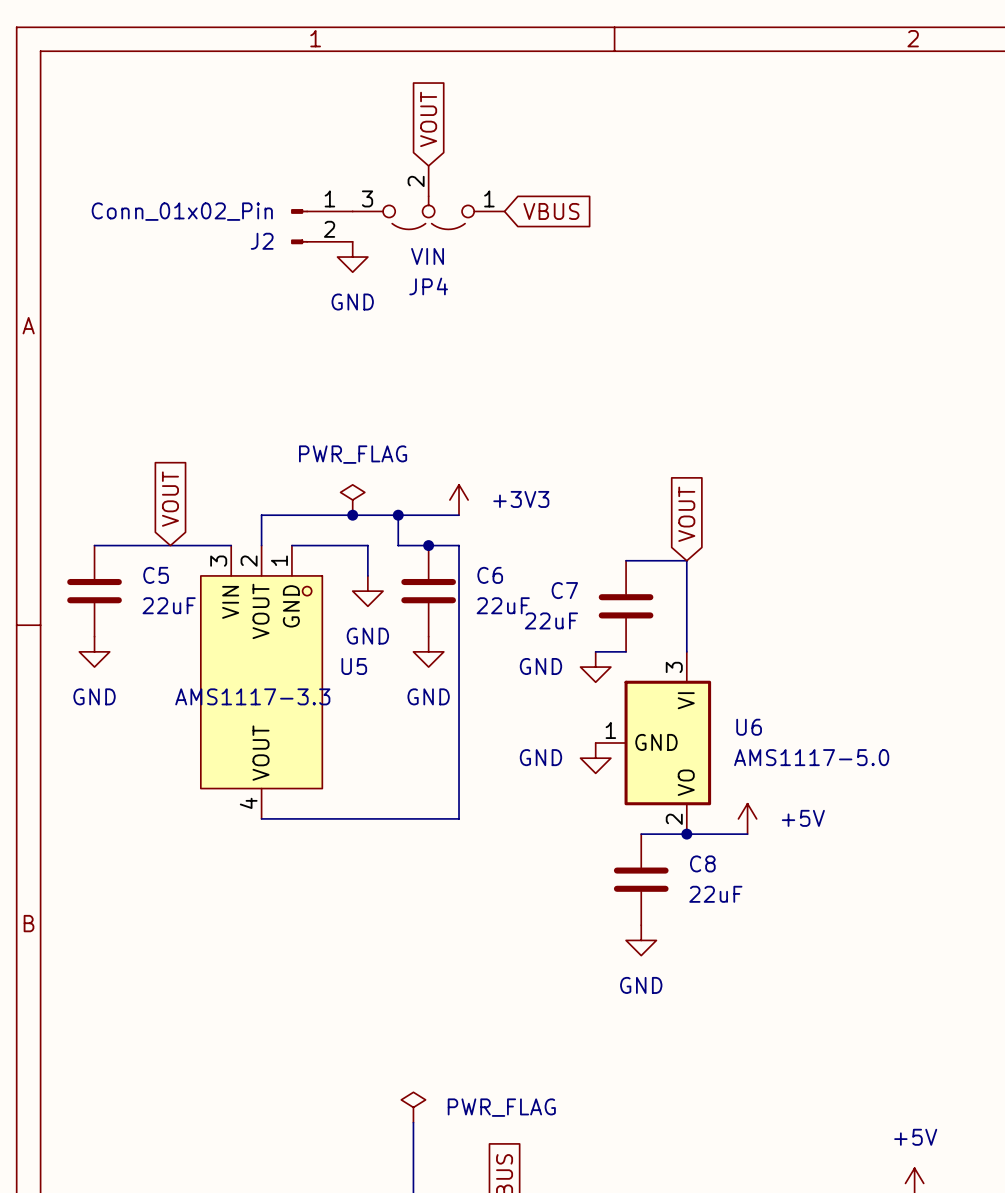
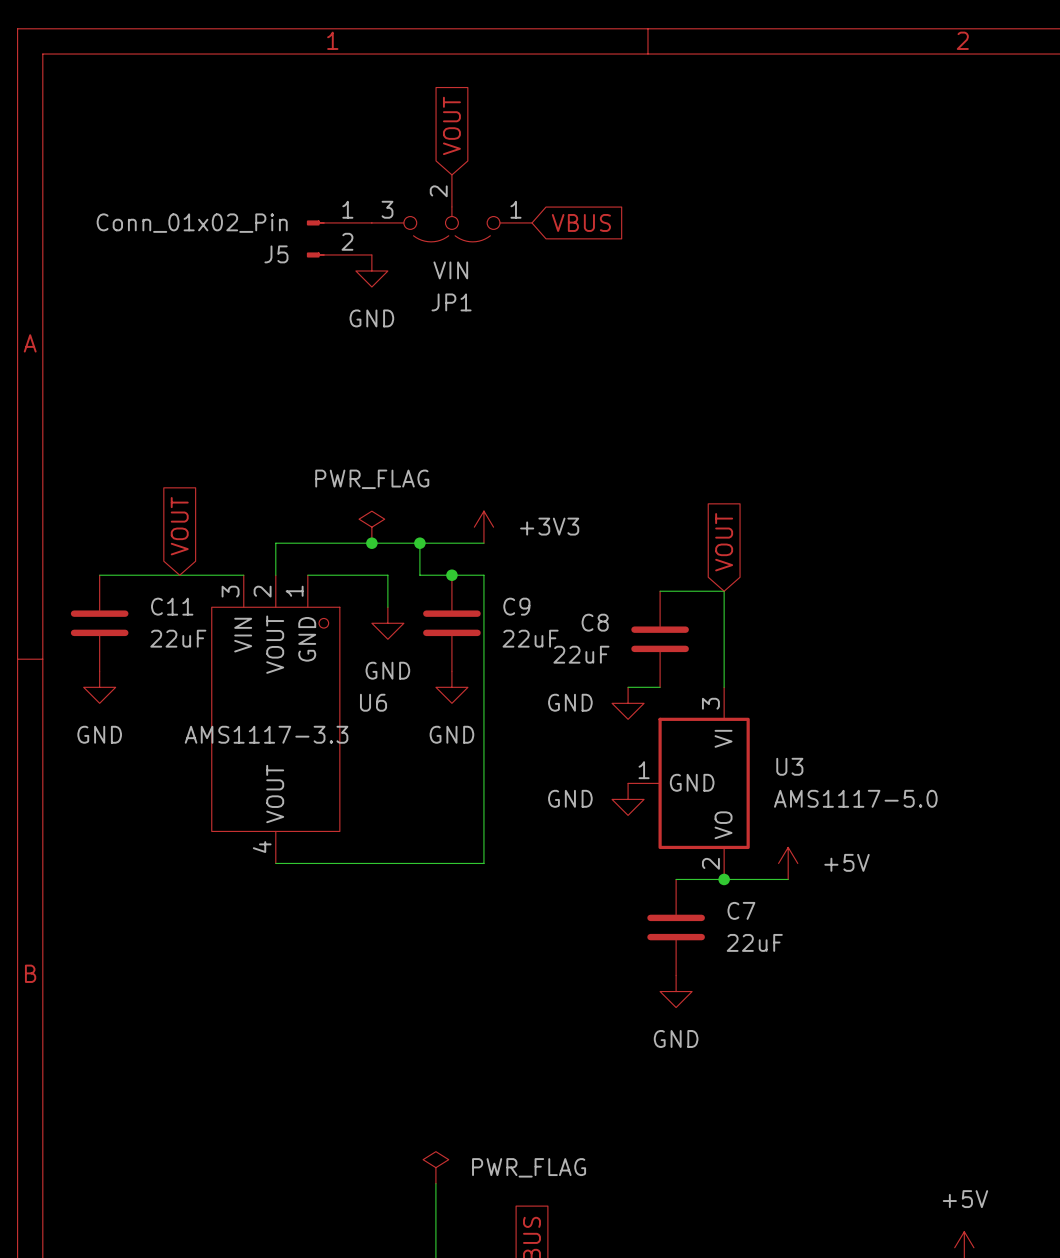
J2 name: J2 (262, 241) -> J5 (276, 254)
JP4 name: JP4 (428, 286) -> JP1 (451, 302)
C5 name: C5 (156, 575) -> C11 (172, 606)
C6 name: C6 (490, 575) -> C9 (516, 606)
C7 name: C7 (564, 590) -> C8 (595, 622)
U5 name: U5 (354, 666) -> U6 (373, 702)
U6 name: U6 (749, 727) -> U3 (789, 766)
C8 name: C8 (702, 863) -> C7 (741, 910)

